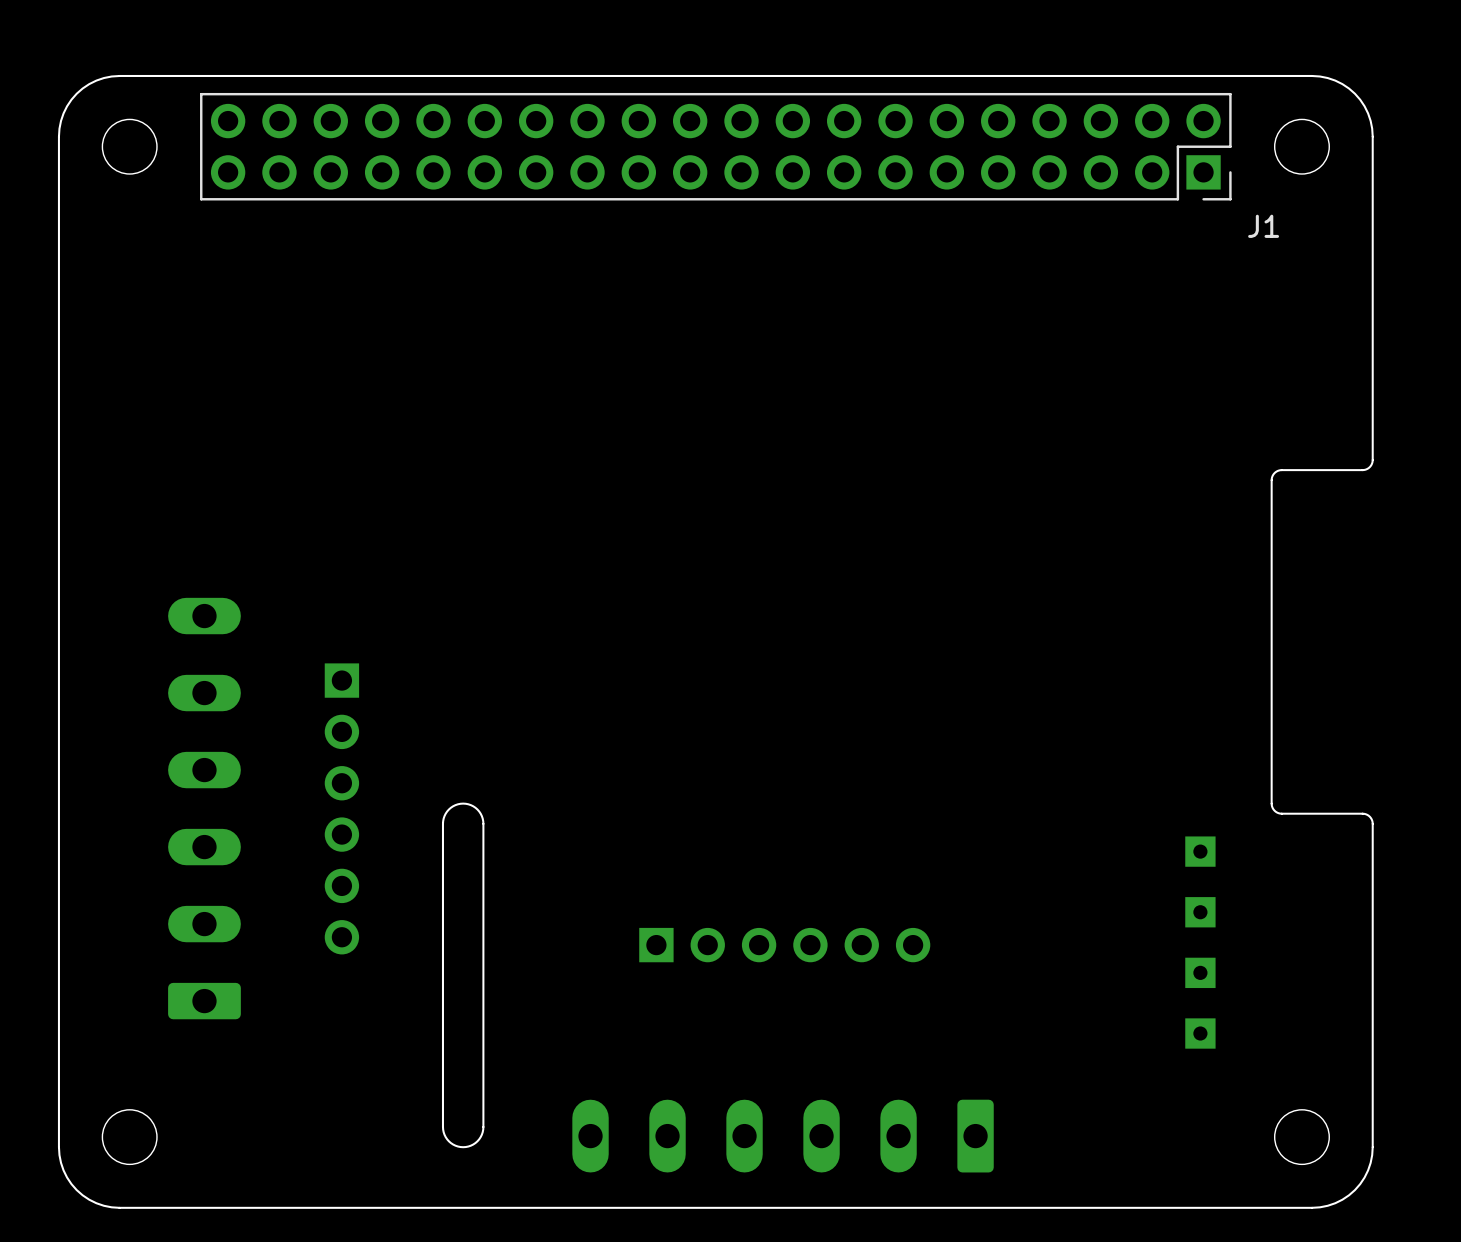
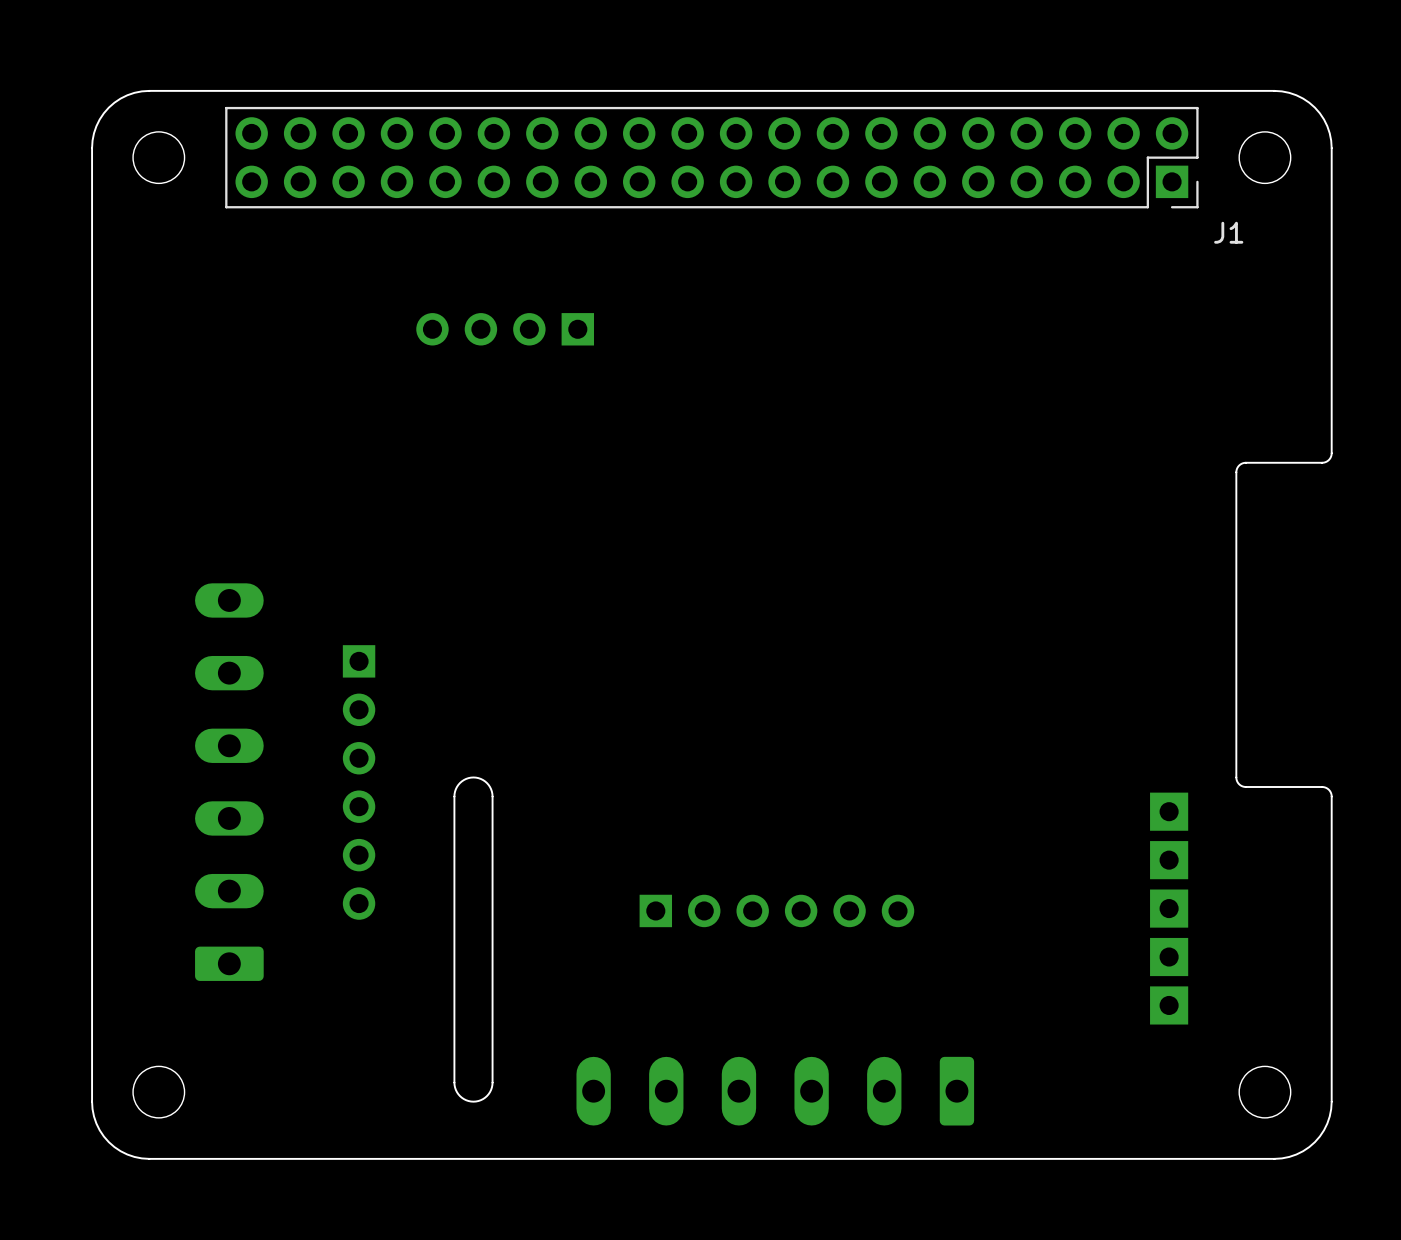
part: none -> (505, 329)
part footprint: [1185, 836, 1216, 867] -> [1150, 792, 1189, 831]
part: none -> (1169, 860)
part: (1200, 912) -> none
part: none -> (1169, 908)
part: (1200, 972) -> none
part: none -> (1169, 957)
part footprint: [1185, 1018, 1216, 1049] -> [1150, 986, 1189, 1025]

